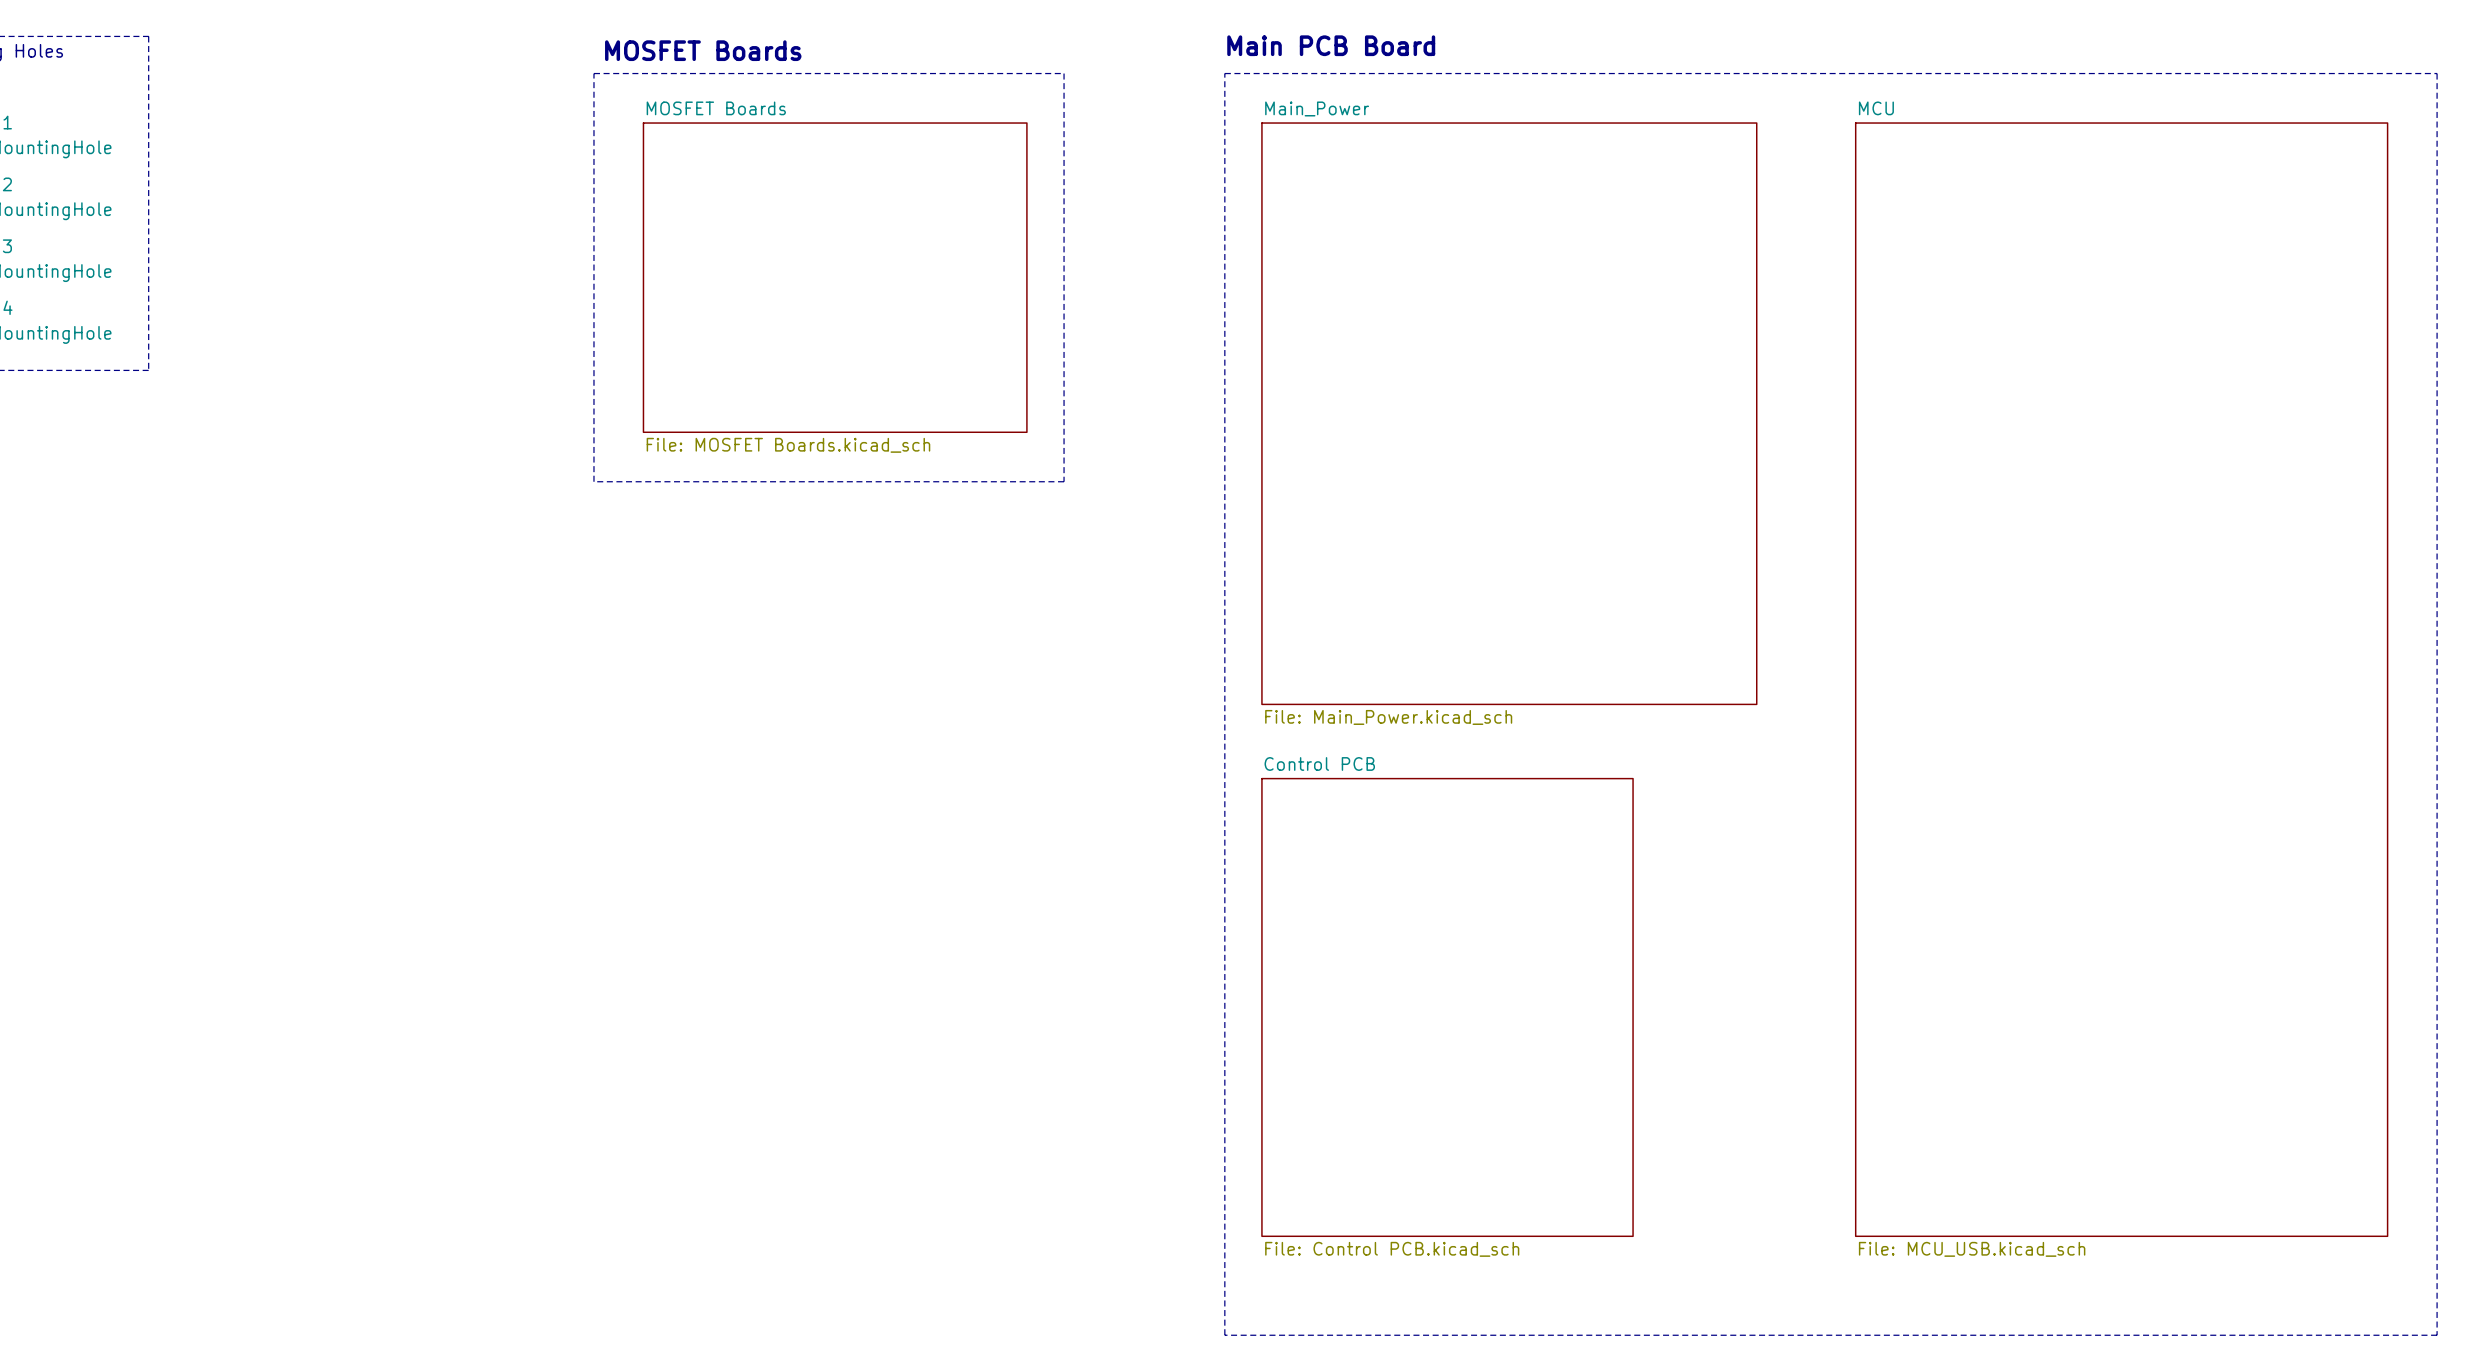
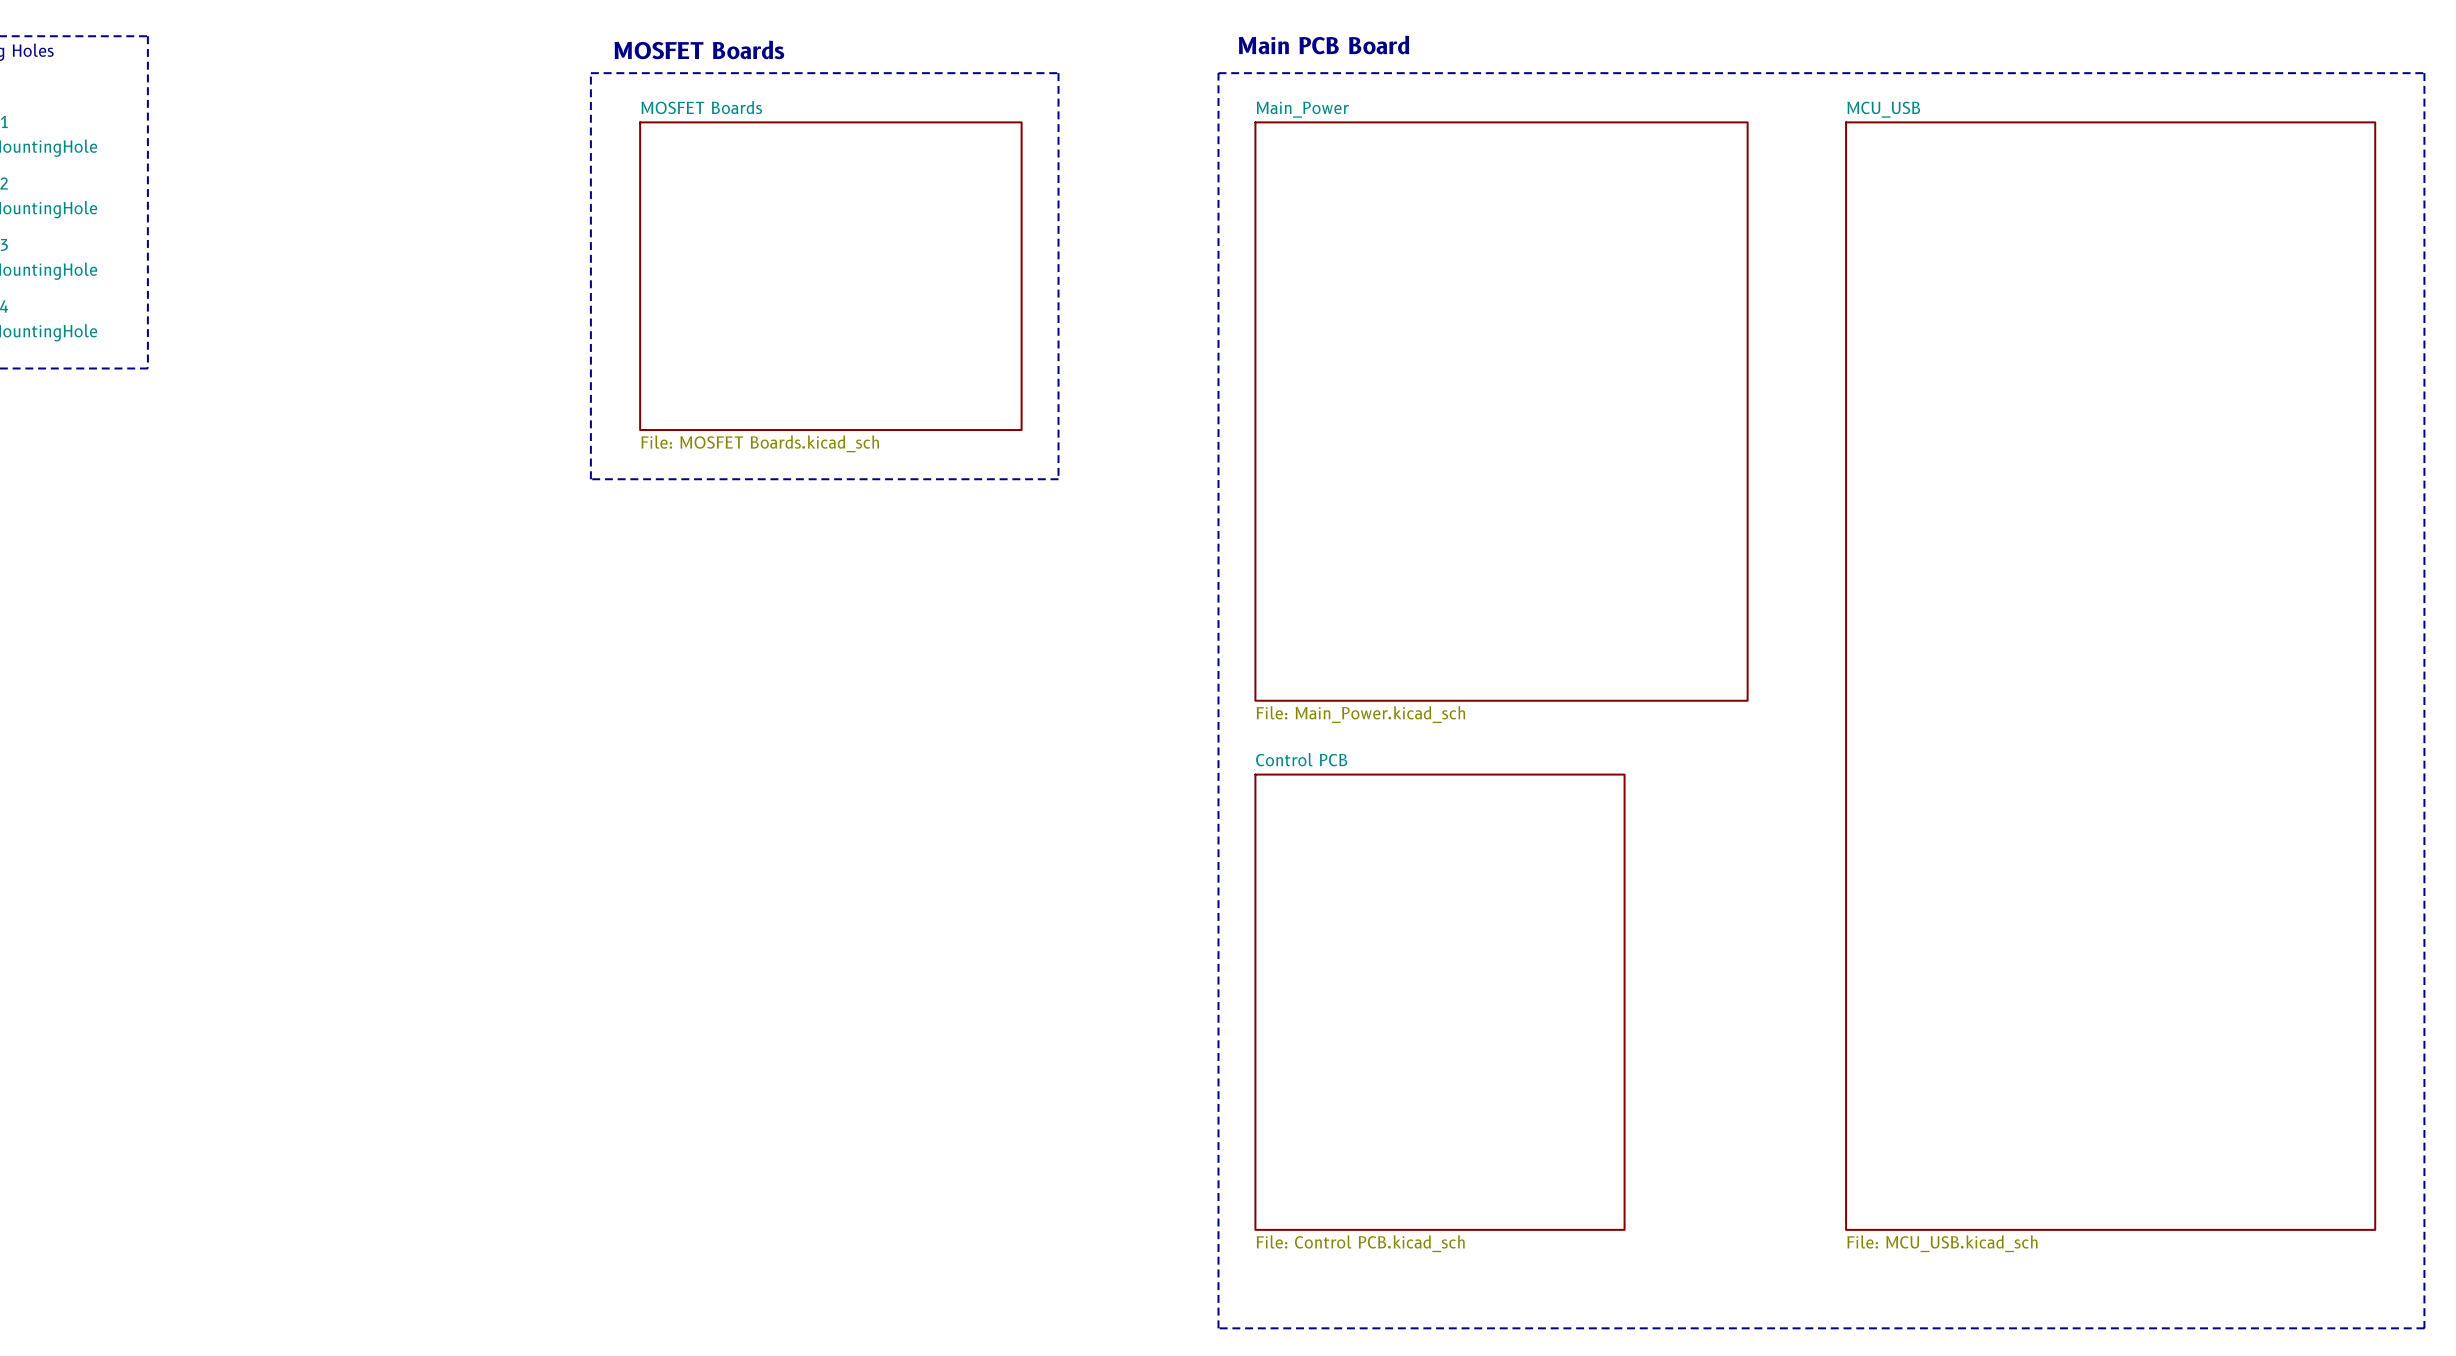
sheet MCU name: MCU (1876, 108) -> MCU_USB (1883, 109)

